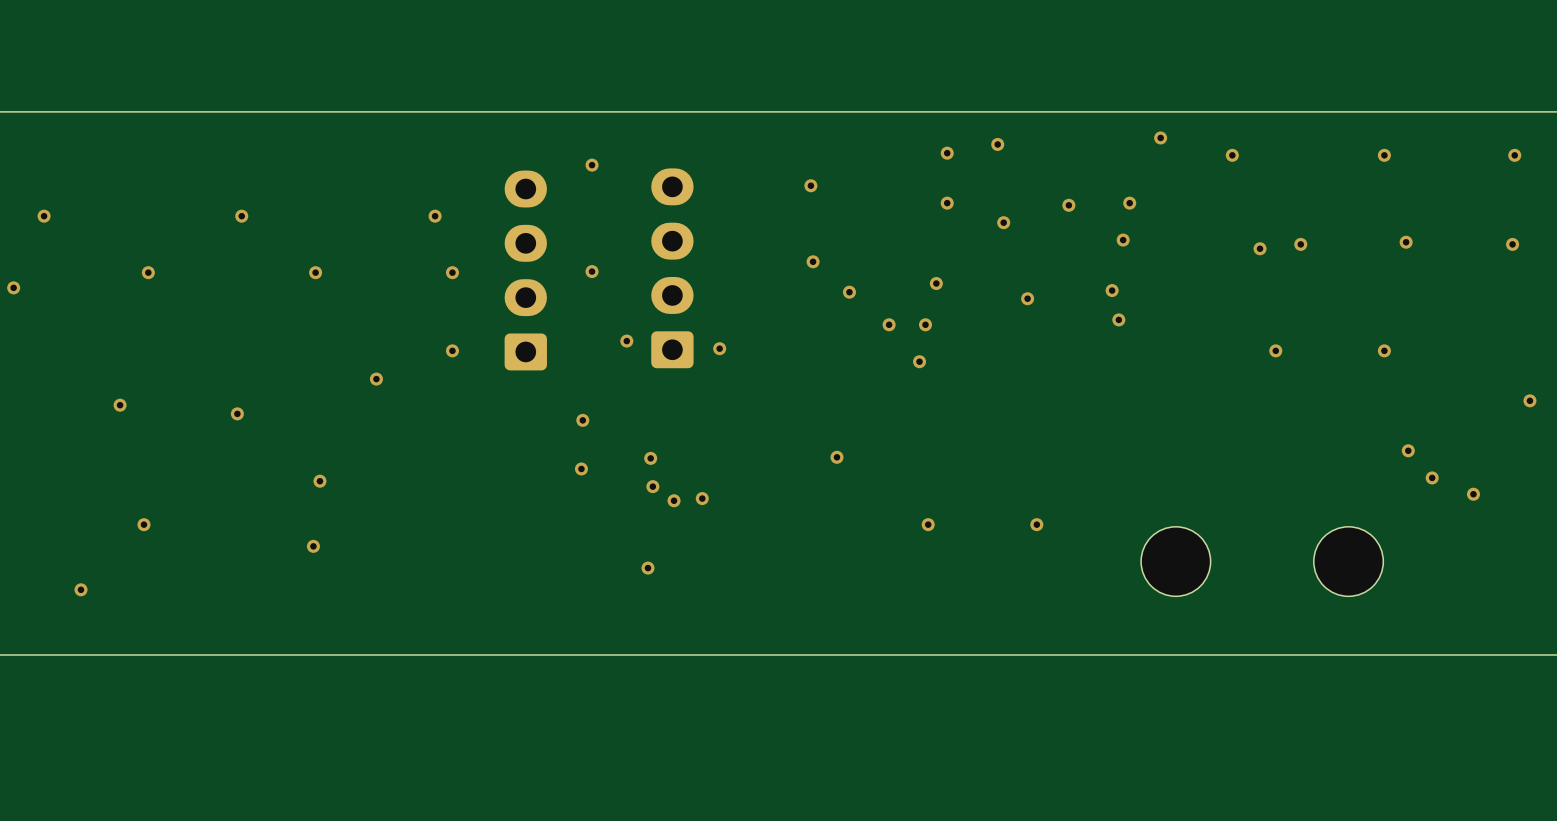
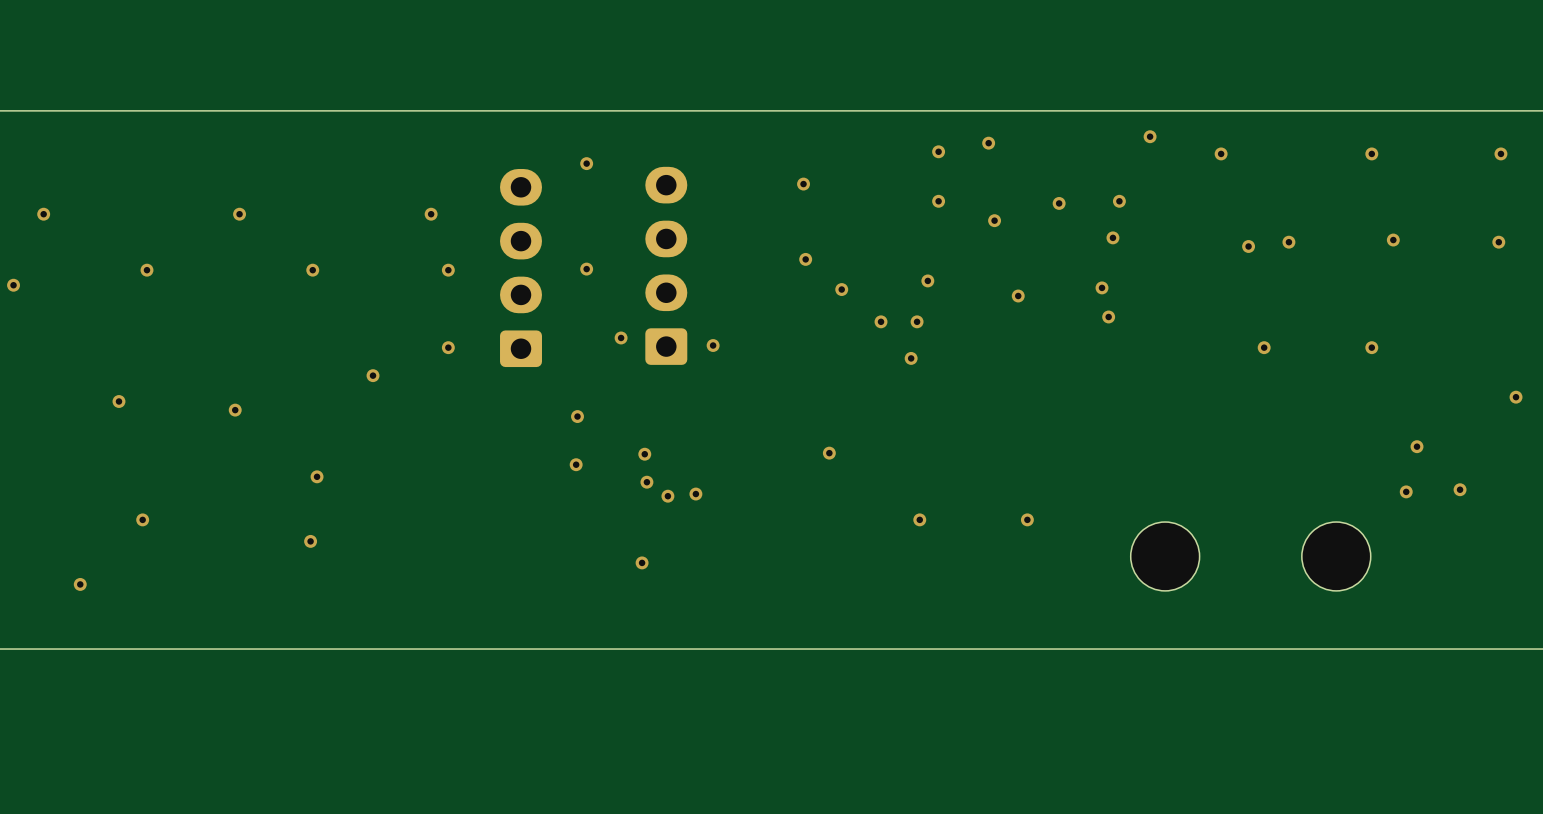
via: (1408, 450) -> none
via: none -> (1417, 446)
via: (1432, 477) -> none
via: none -> (1406, 491)

